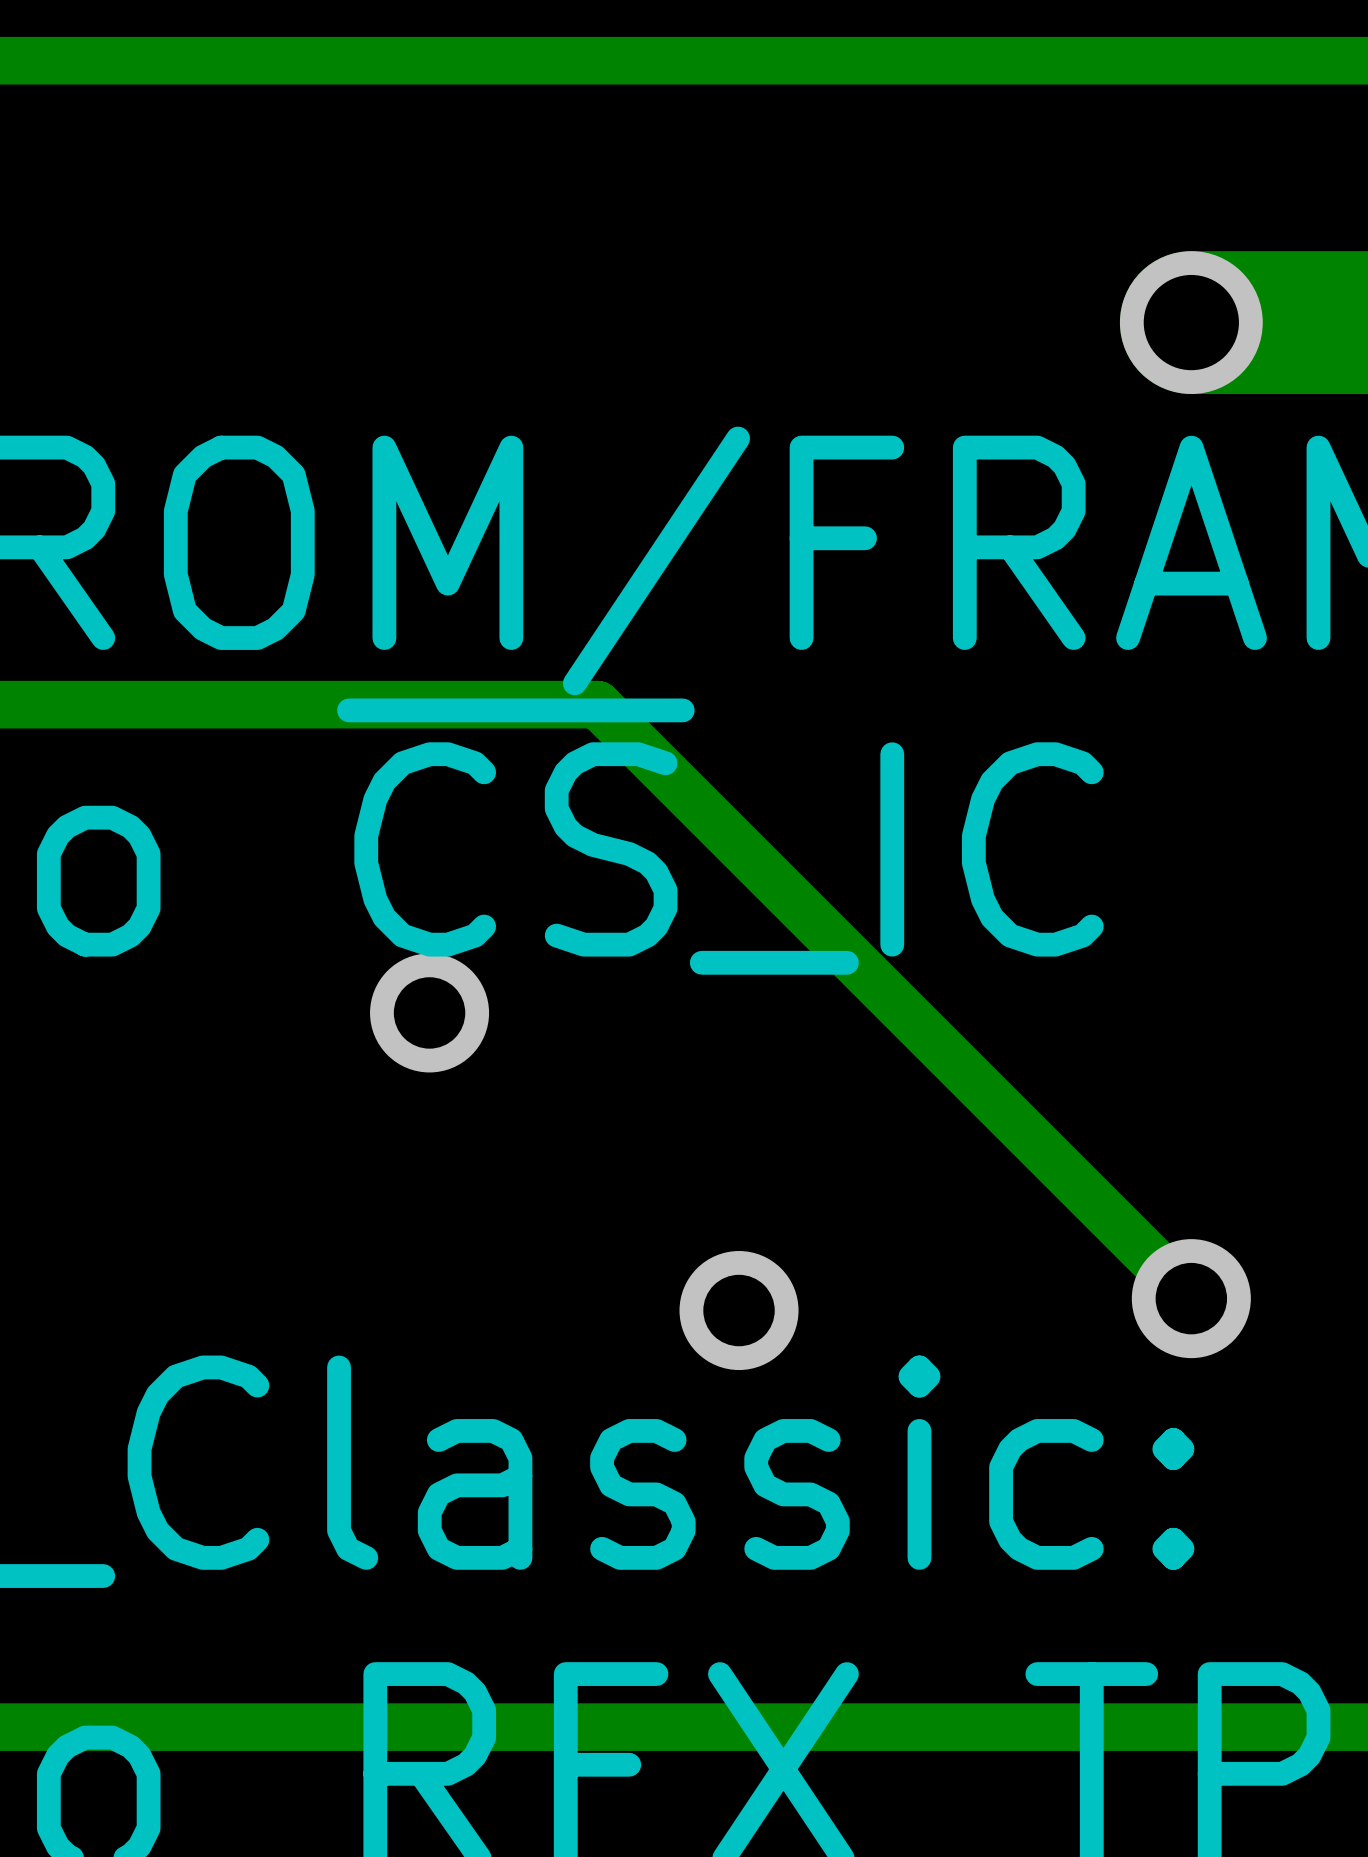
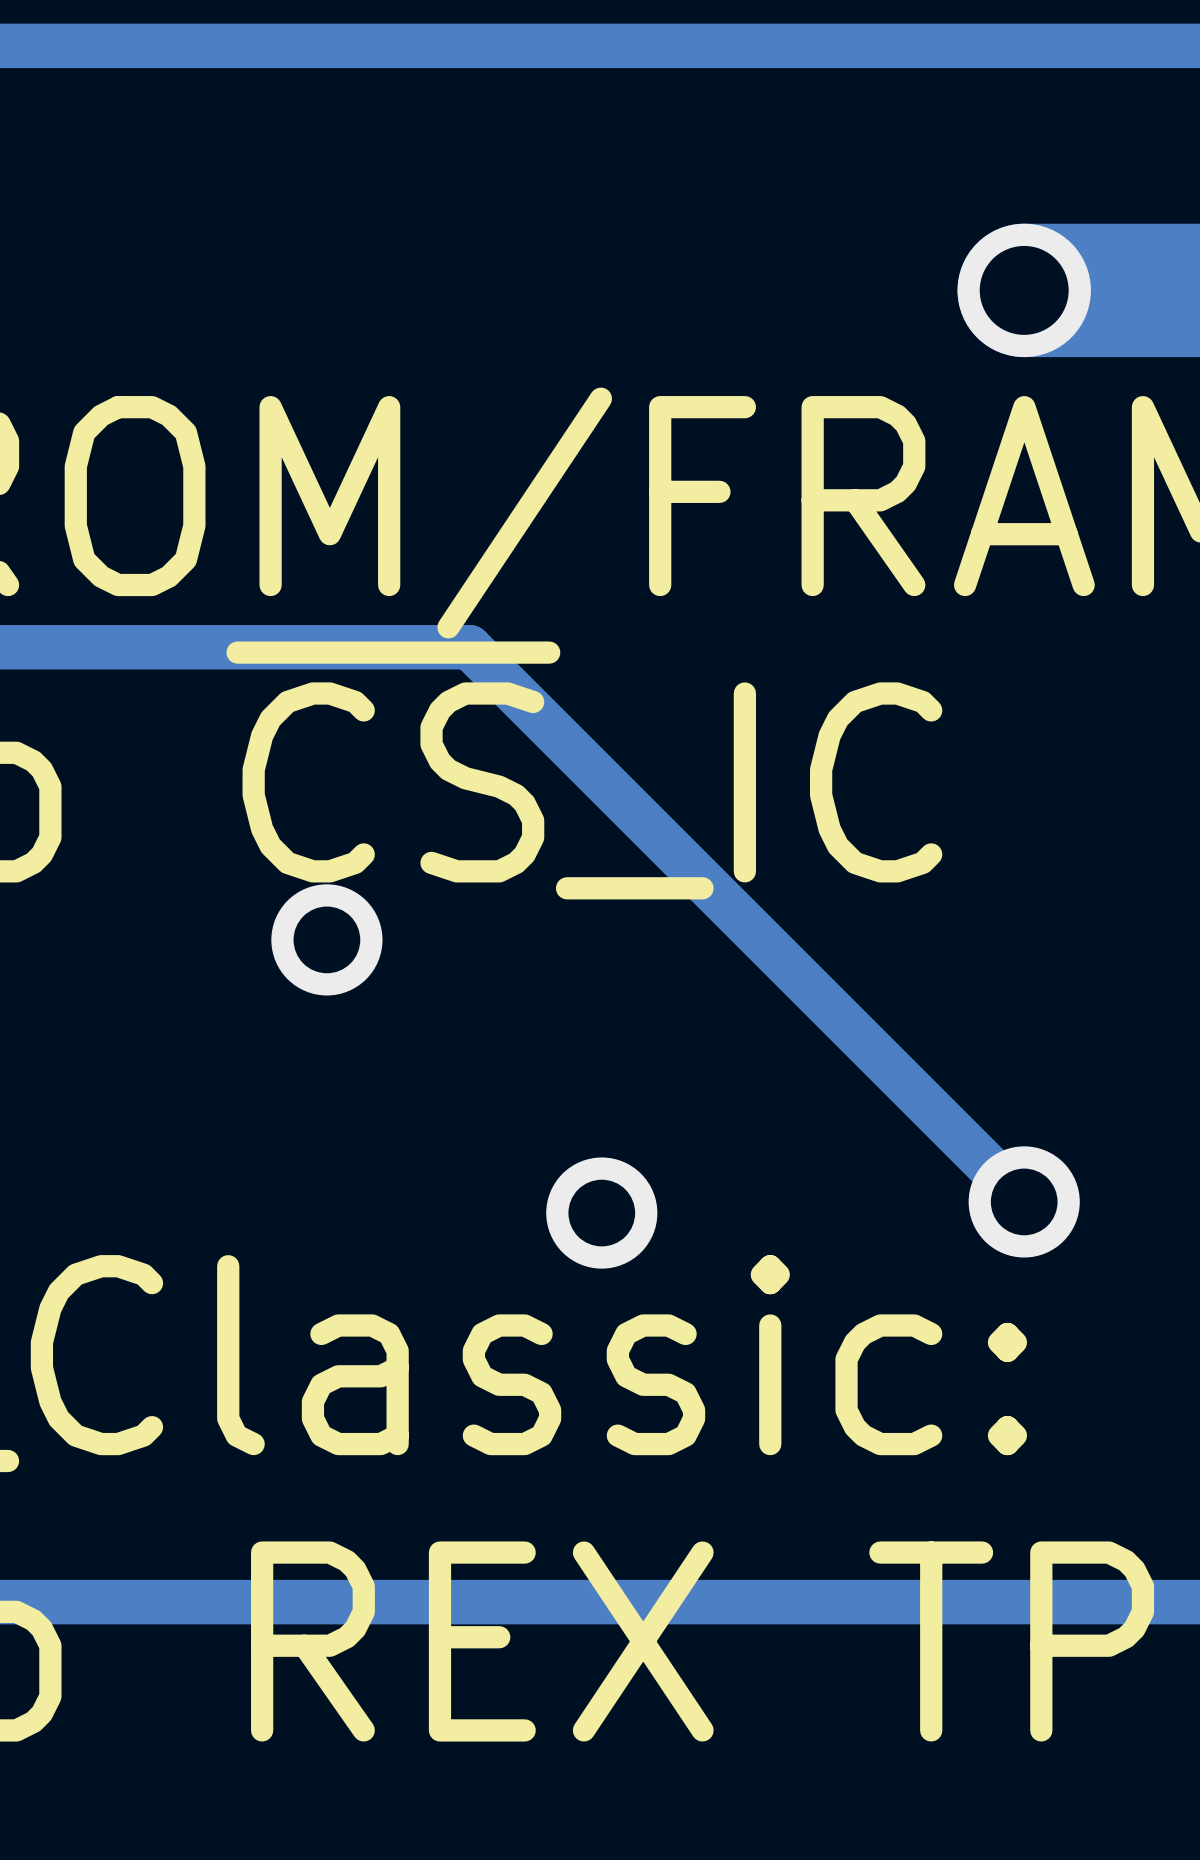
via position: (429, 1012) -> (326, 939)

